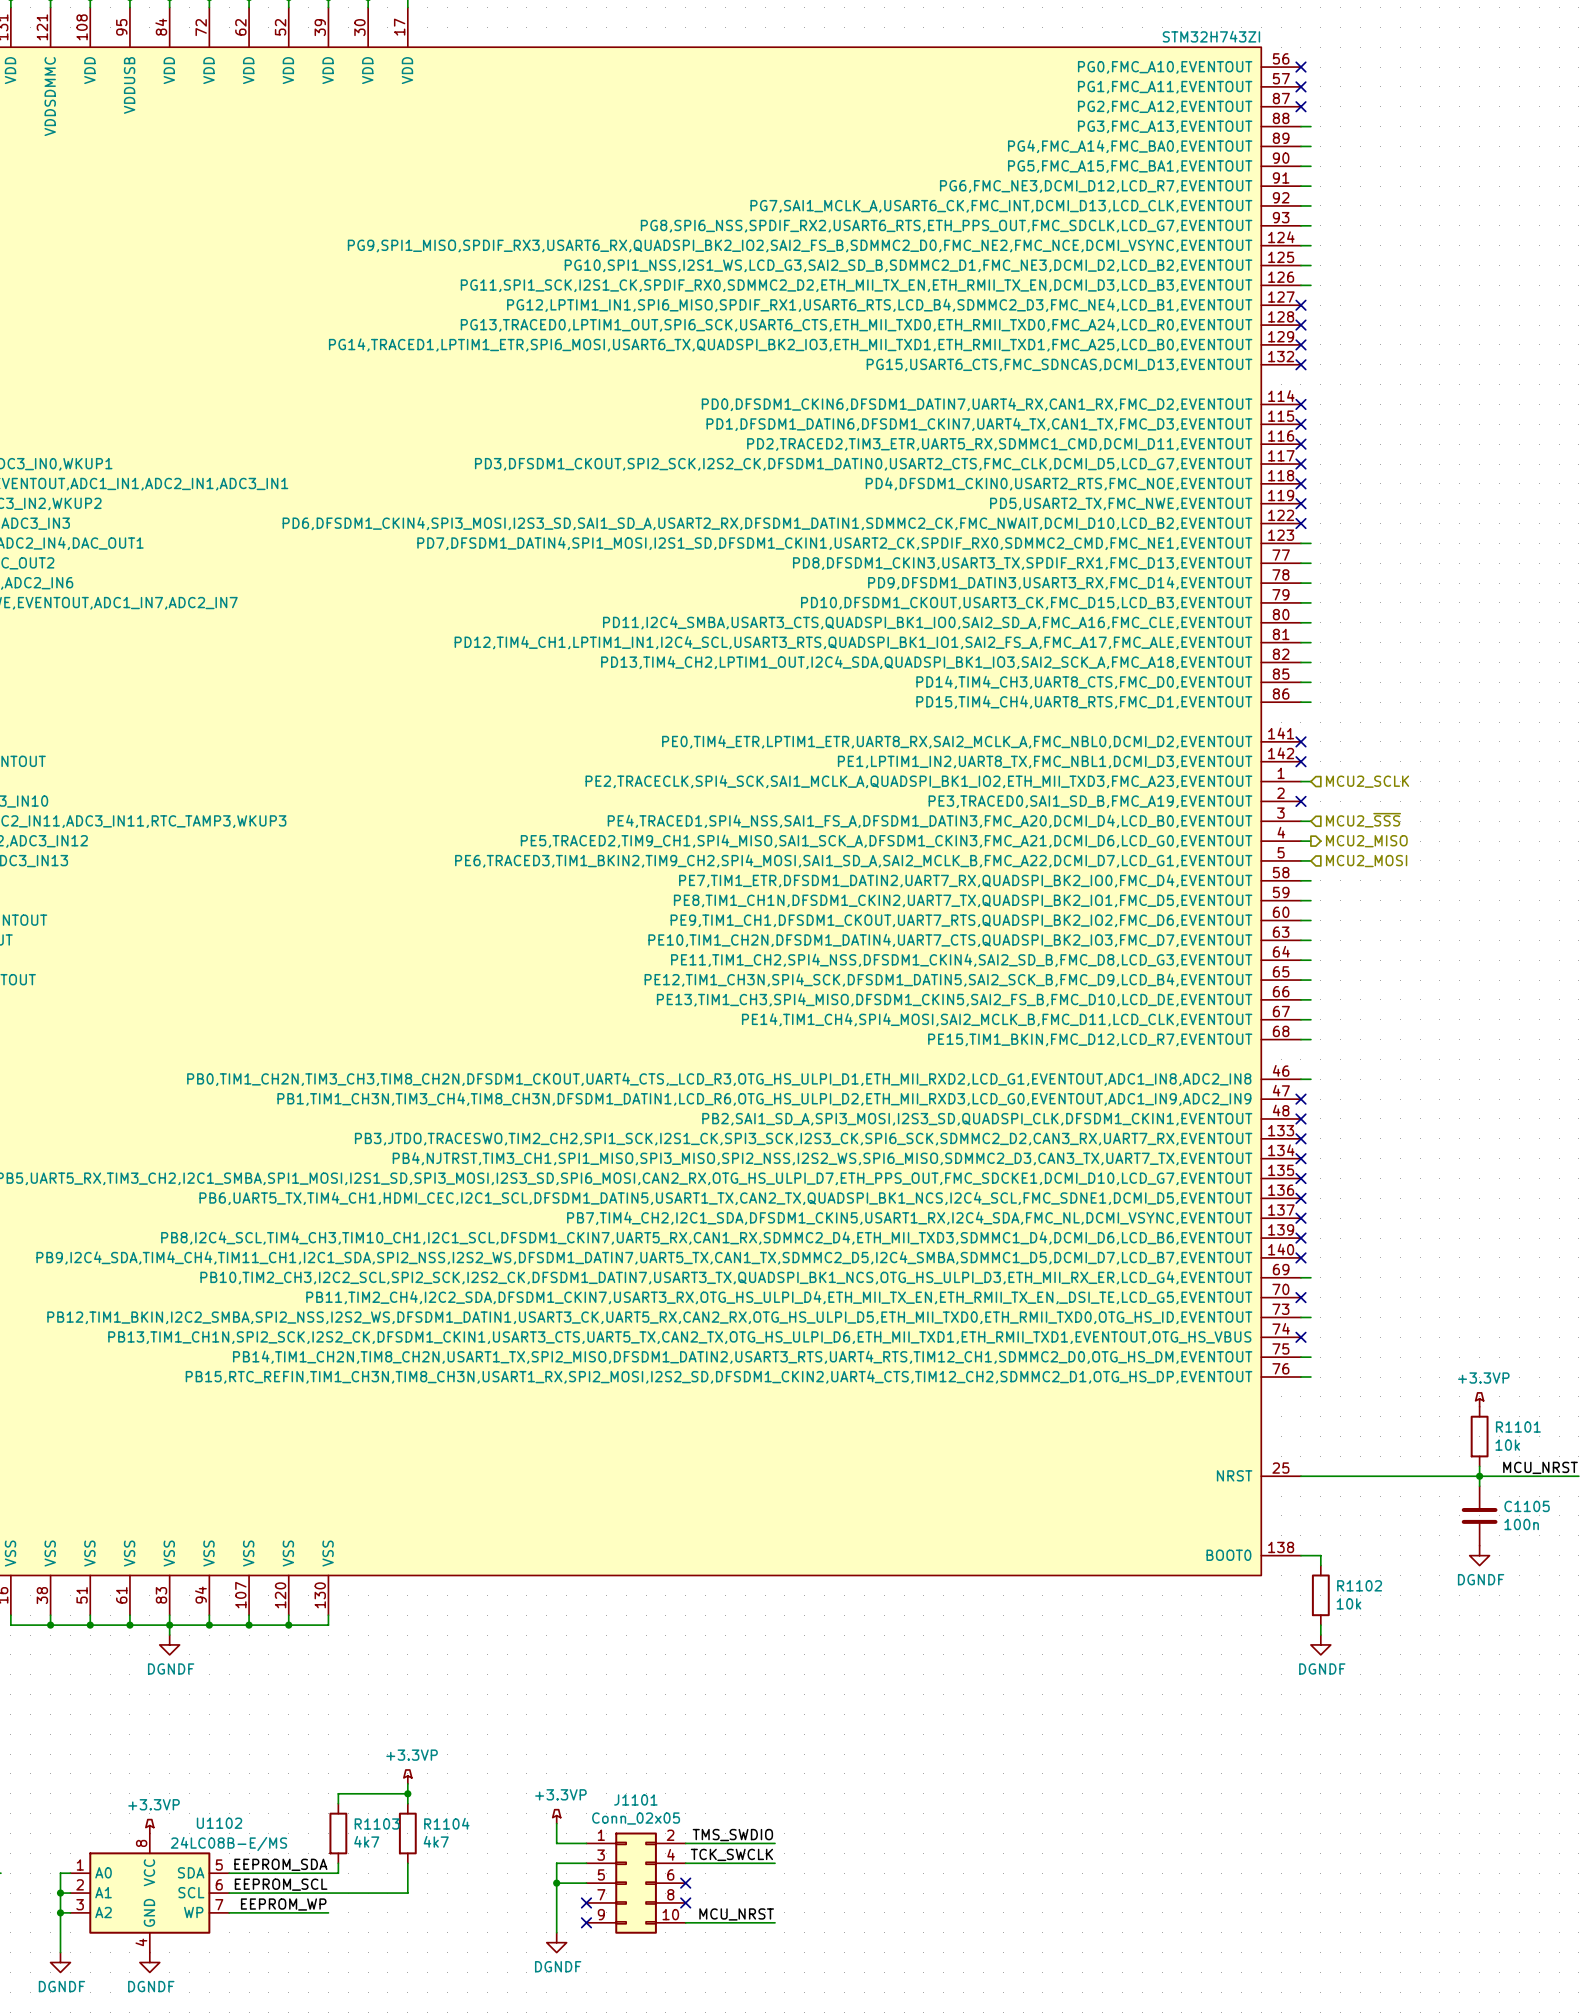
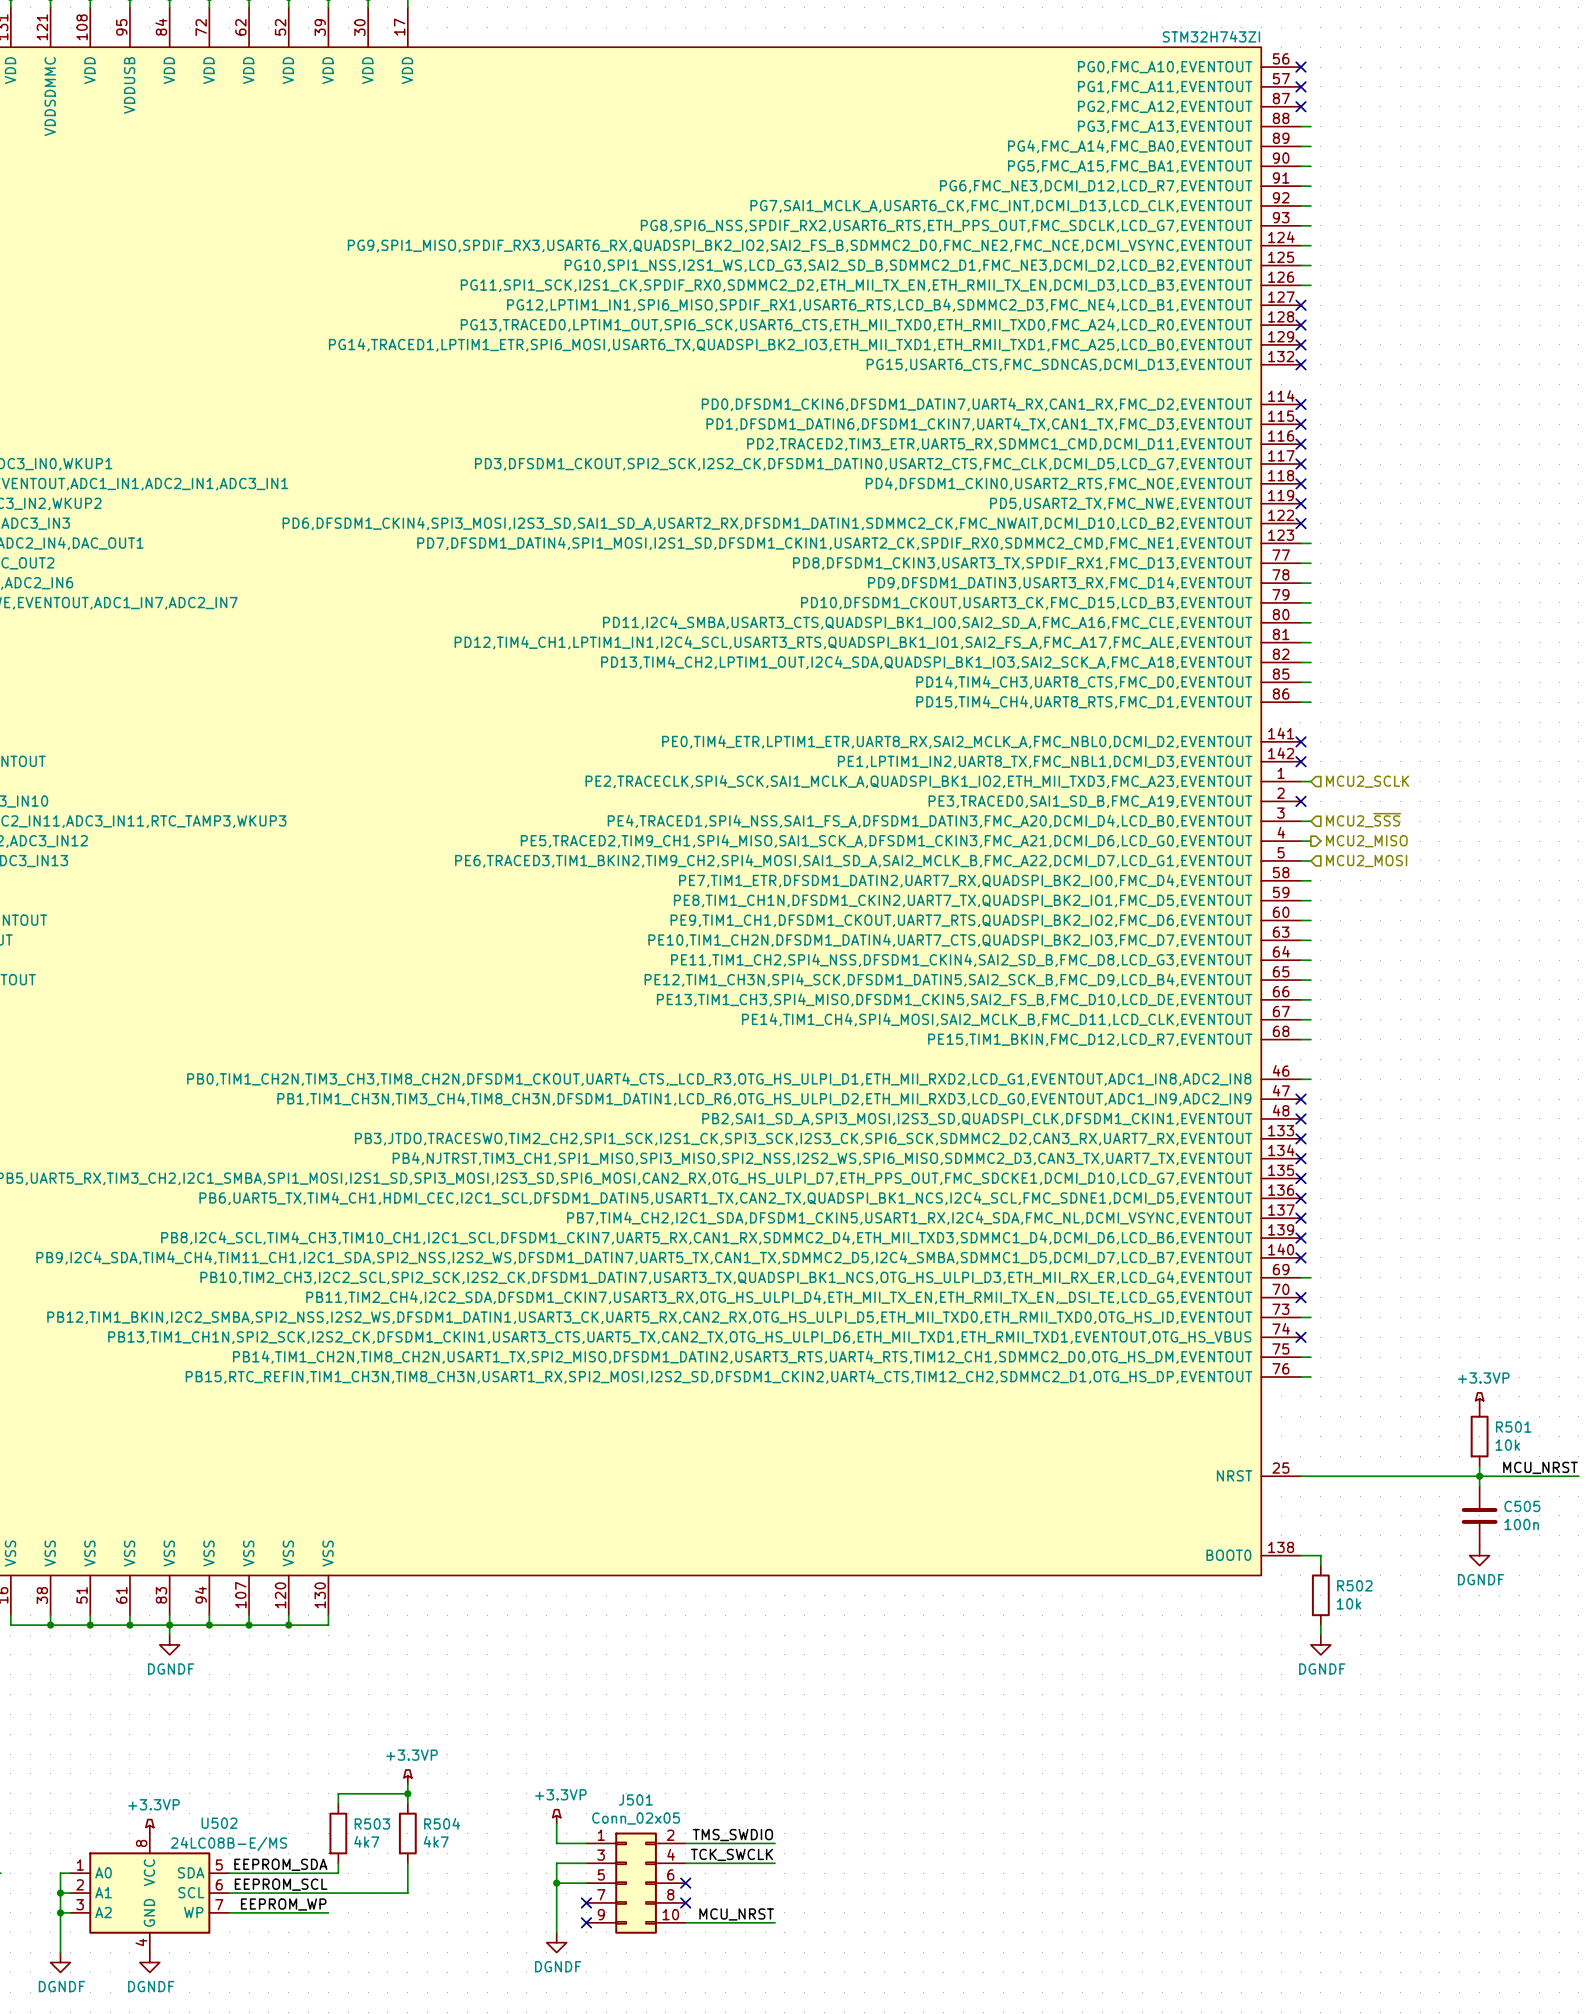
R1101 name: R1101 (1518, 1427) -> R501 (1513, 1427)
C1105 name: C1105 (1527, 1506) -> C505 (1522, 1506)
R1102 name: R1102 (1359, 1585) -> R502 (1354, 1585)
J1101 name: J1101 (635, 1799) -> J501 (635, 1799)
U1102 name: U1102 (219, 1823) -> U502 (219, 1823)
R1104 name: R1104 (446, 1823) -> R504 (442, 1823)
R1103 name: R1103 (377, 1824) -> R503 (372, 1824)

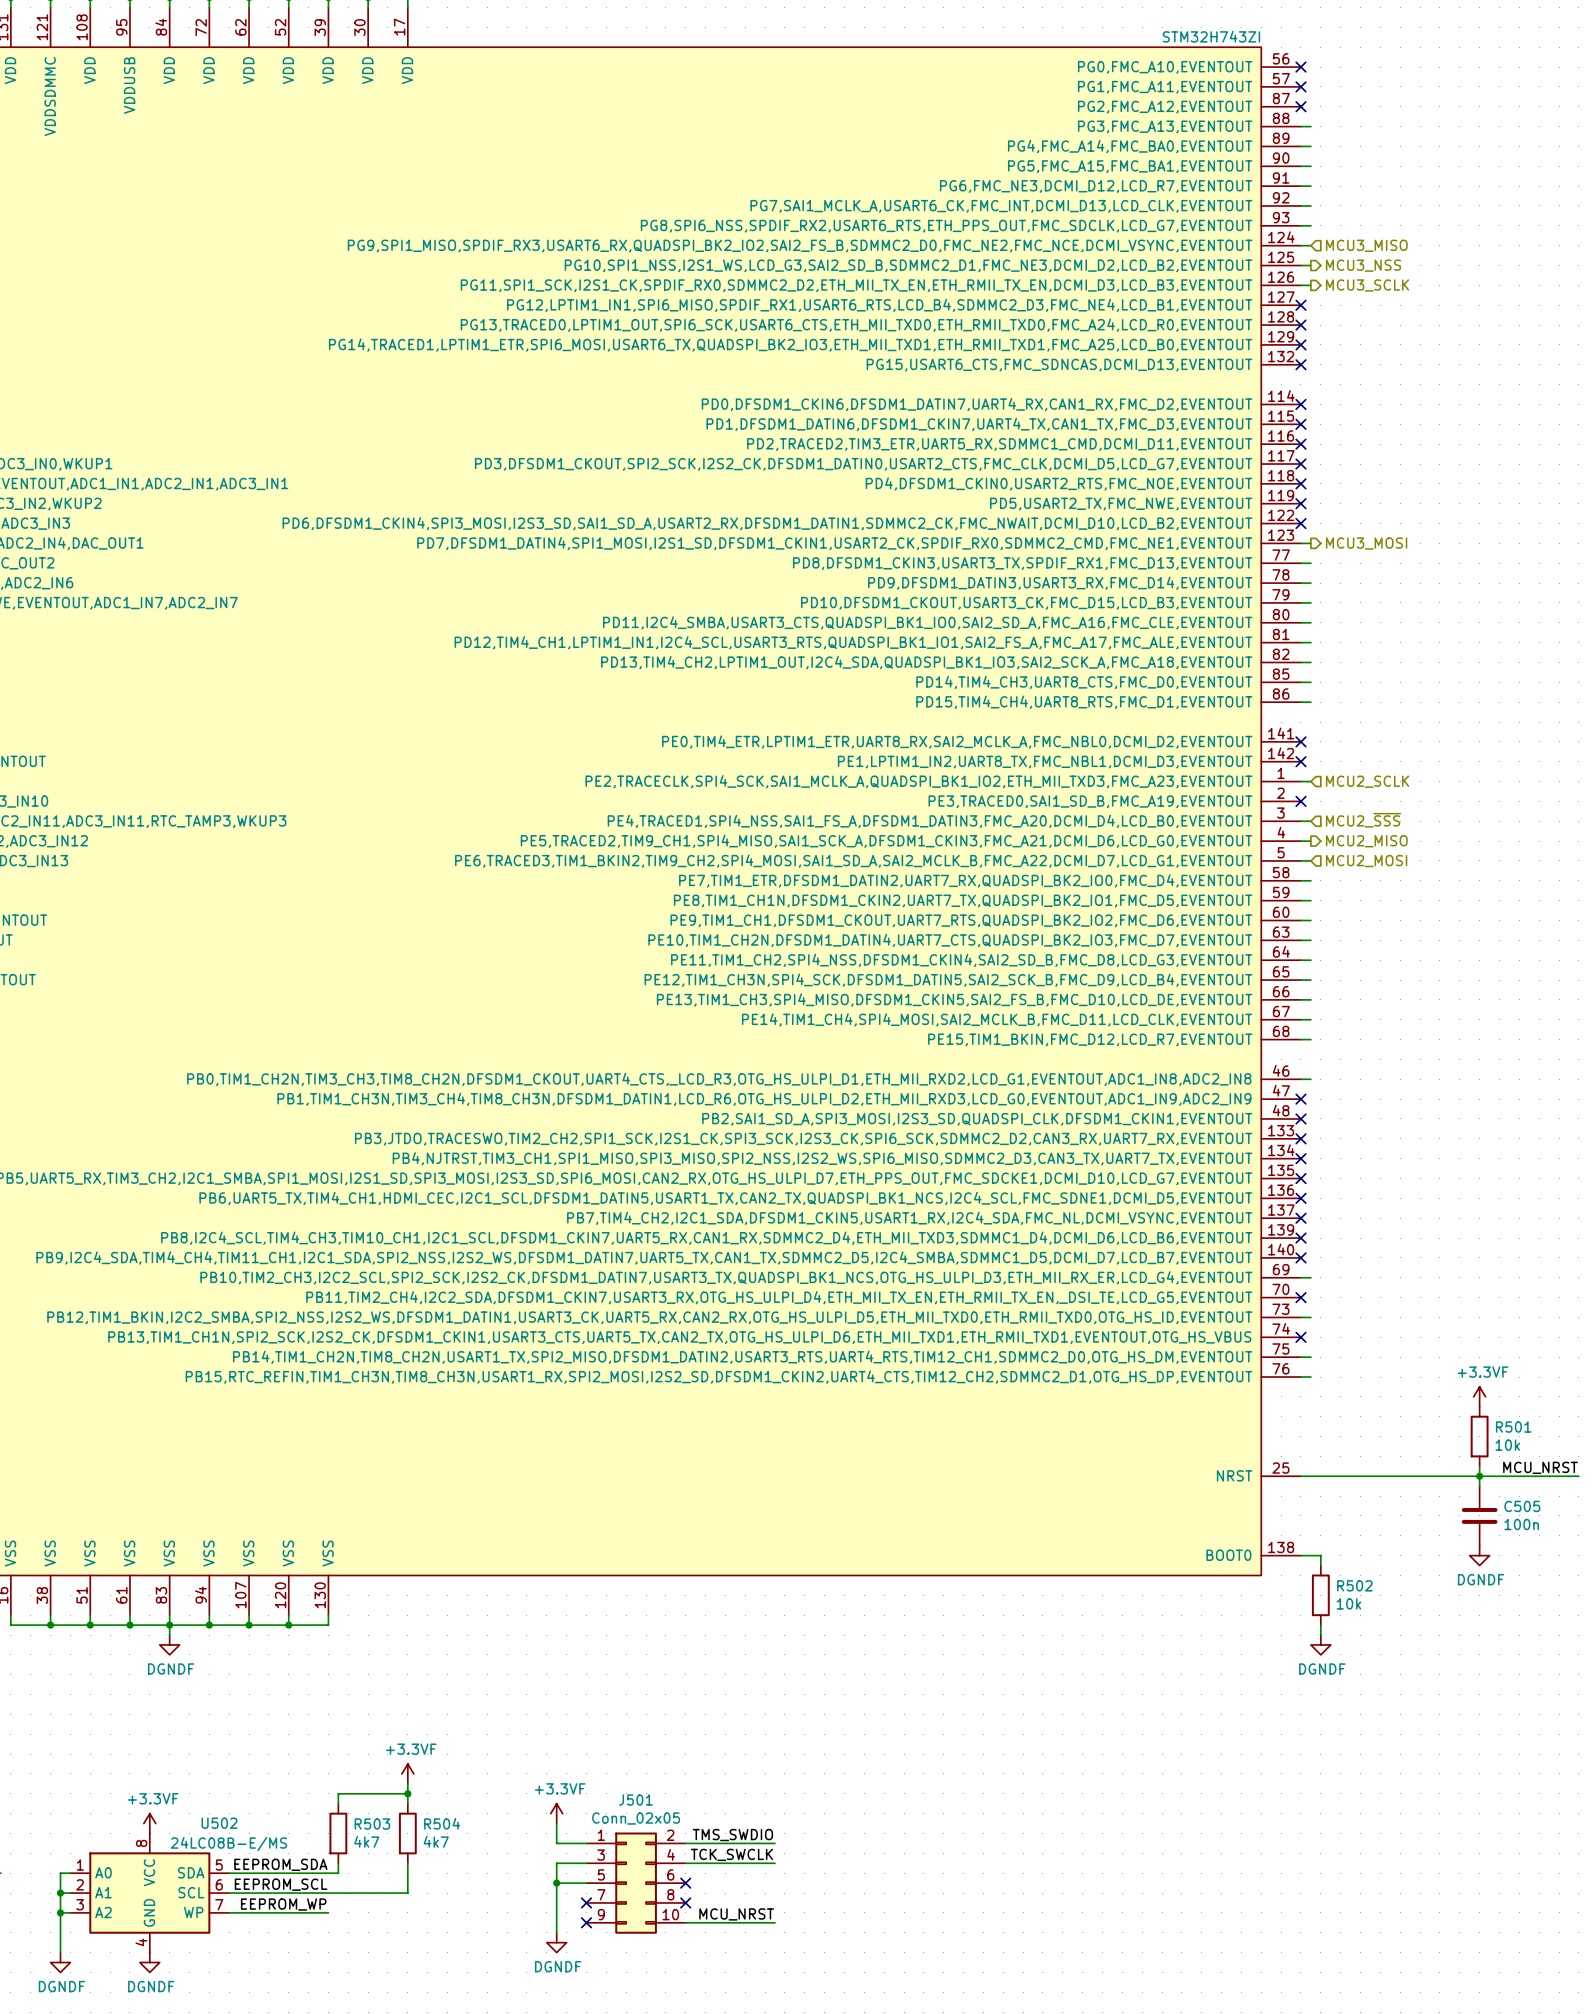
hierarchical label: none -> MCU3_MISO (1366, 245)
hierarchical label: none -> MCU3_NSS (1363, 265)
hierarchical label: none -> MCU3_SCLK (1367, 285)
hierarchical label: none -> MCU3_MOSI (1366, 543)
power symbol: +3.3VP (1479, 1399) -> +3.3VF (1479, 1396)
power symbol: +3.3VP (407, 1776) -> +3.3VF (407, 1773)
power symbol: +3.3VP (556, 1816) -> +3.3VF (556, 1813)
power symbol: +3.3VP (149, 1826) -> +3.3VF (149, 1823)

